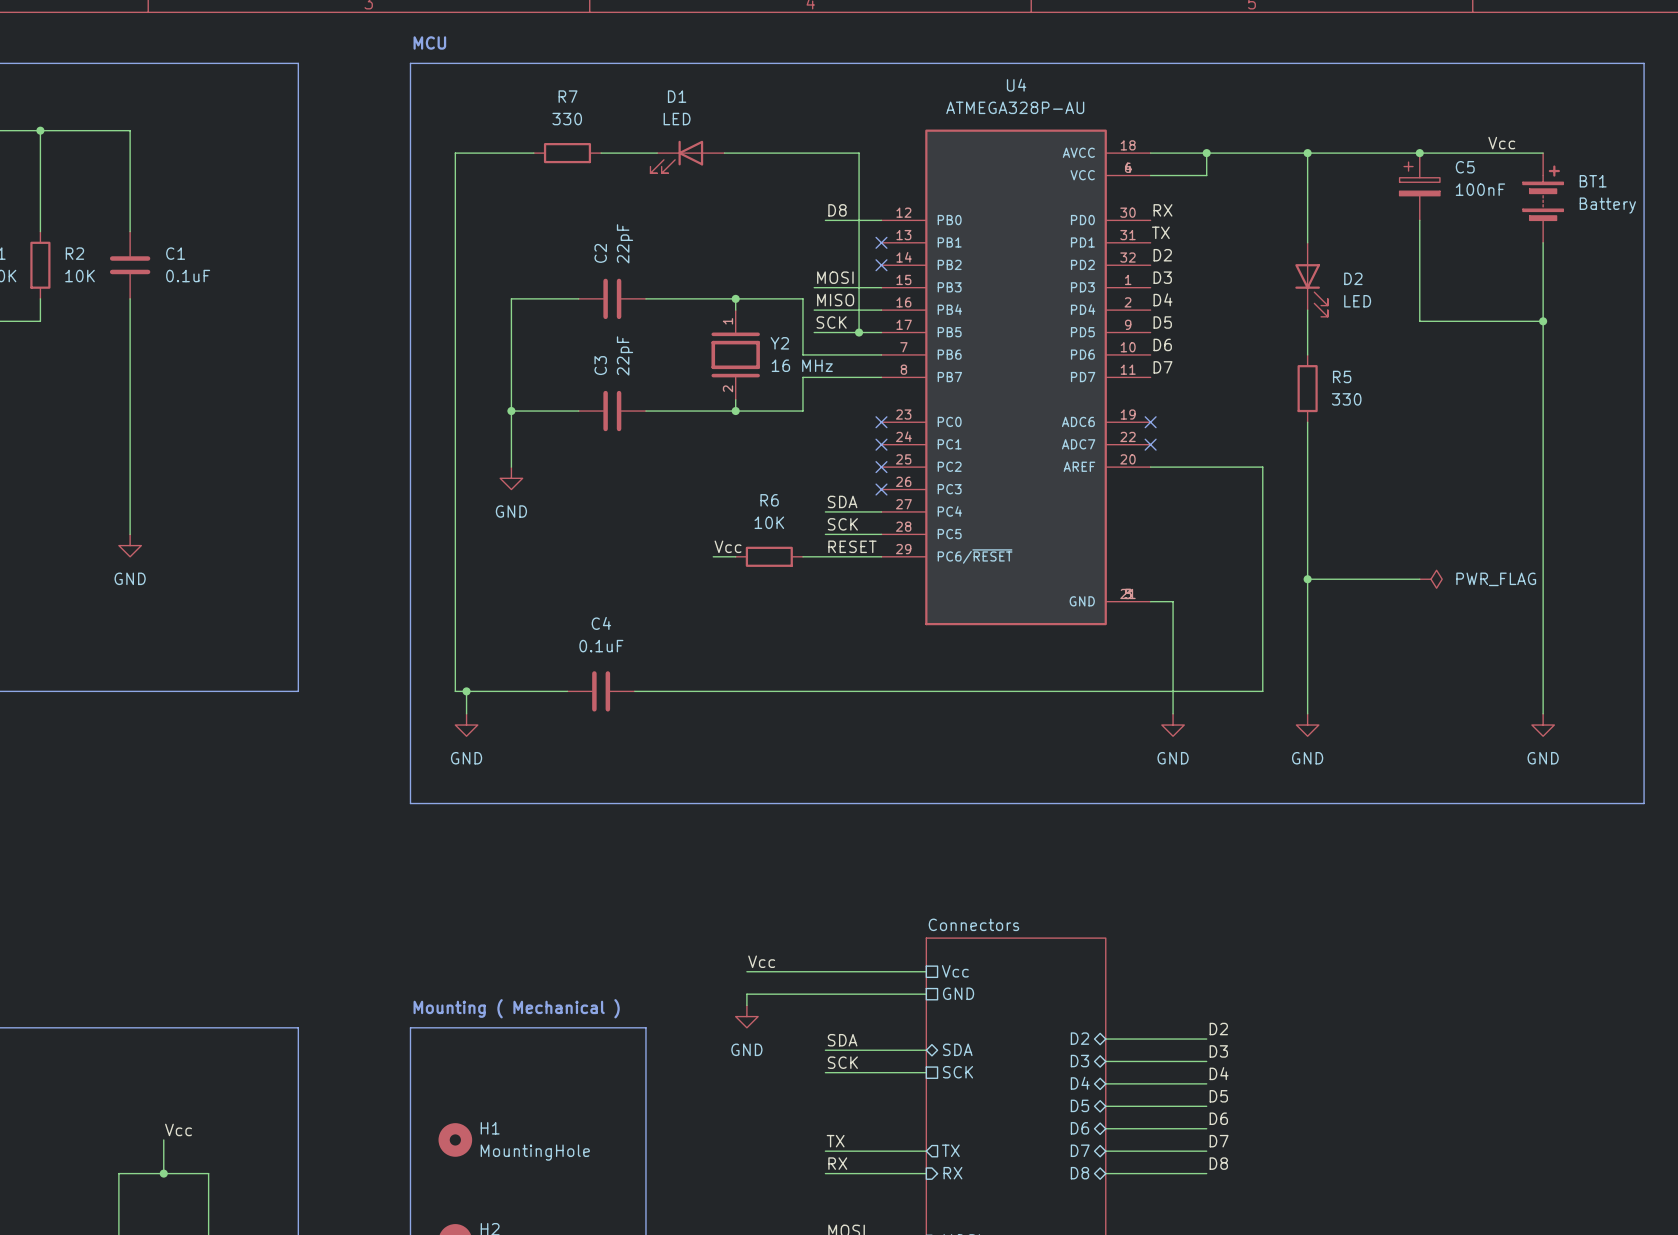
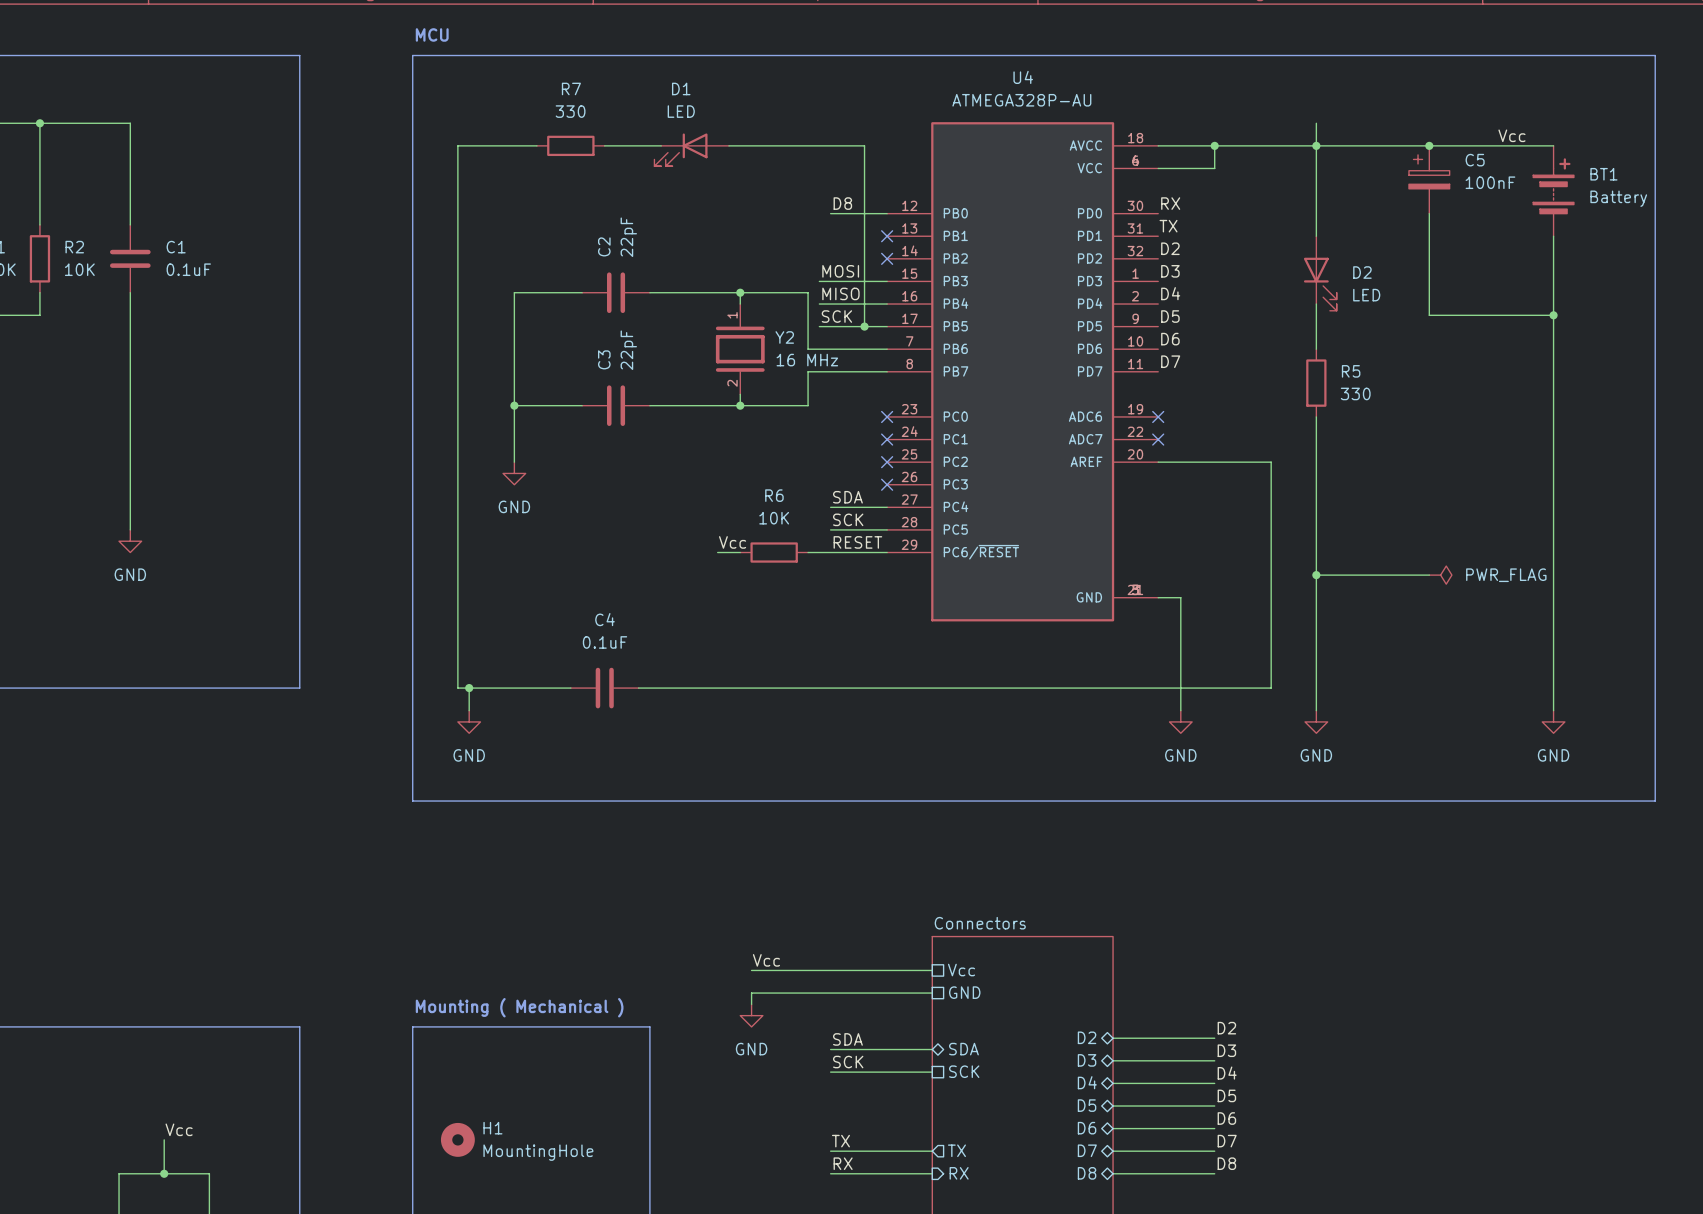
wire: none -> (1316, 123) (1316, 145)

